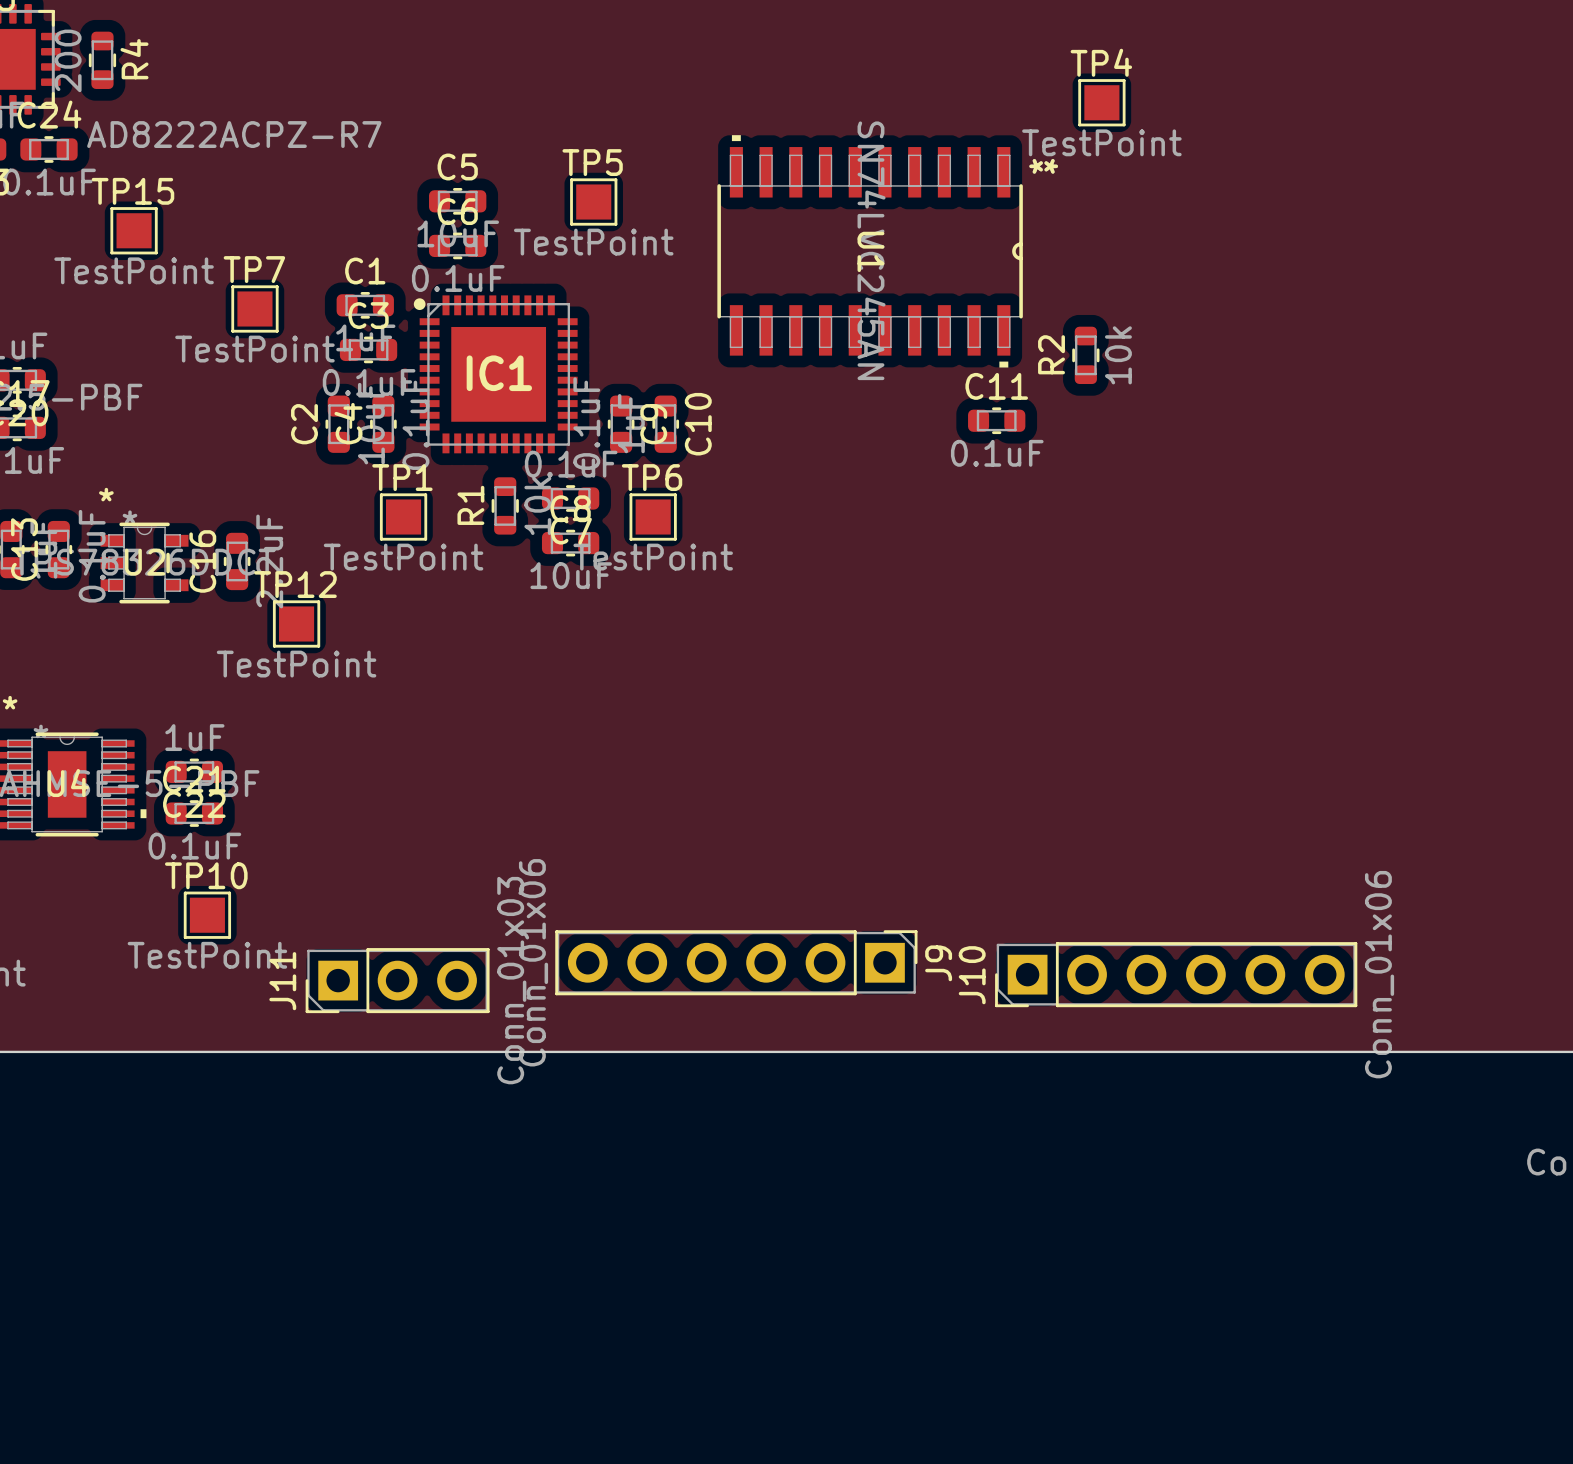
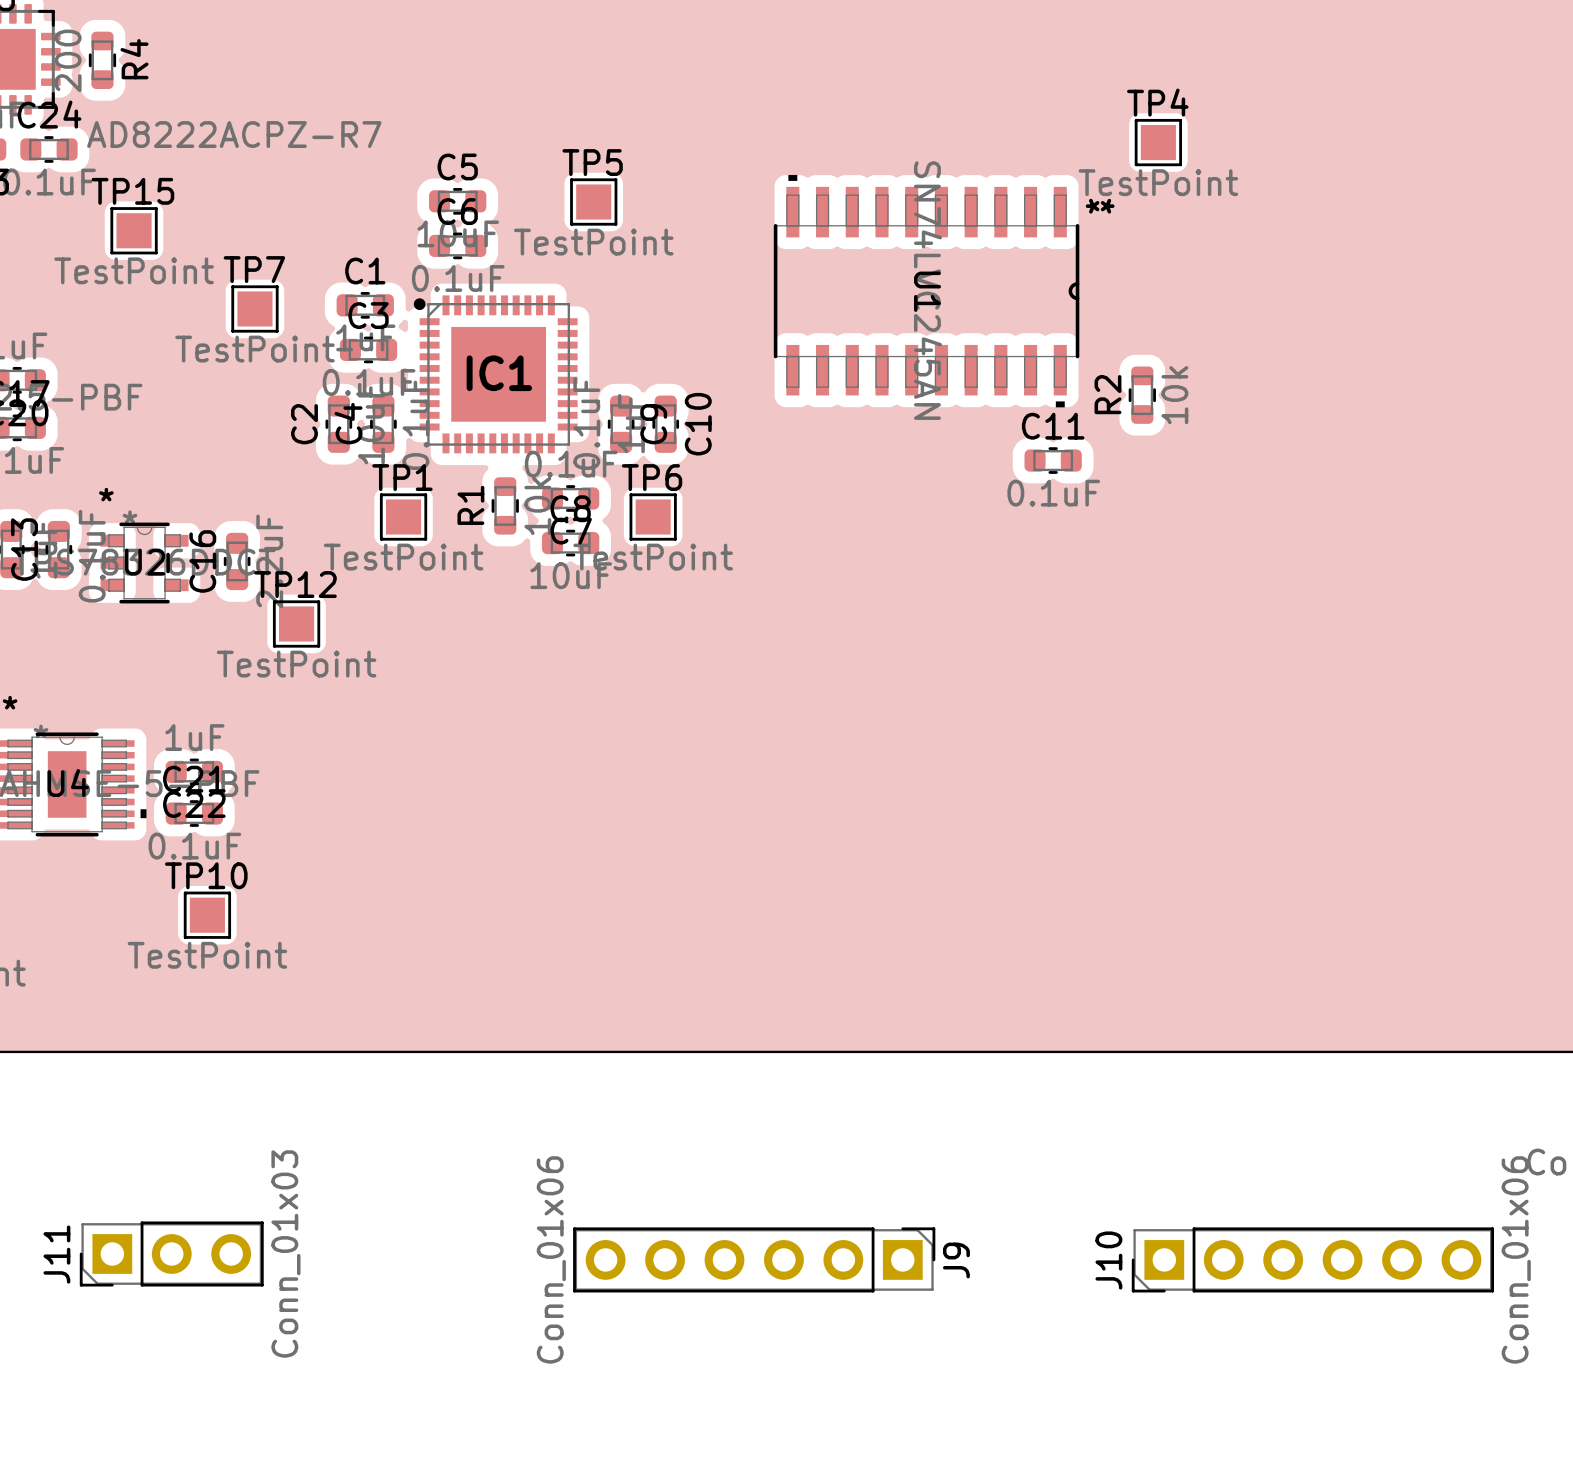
TP4 position: (1101, 102) -> (1158, 142)
U1 position: (870, 251) -> (926, 291)
R2 position: (1085, 355) -> (1142, 395)
C11 position: (996, 420) -> (1053, 460)
J9 position: (736, 962) -> (754, 1259)
J10 position: (1176, 974) -> (1312, 1259)
J11 position: (397, 980) -> (171, 1253)

